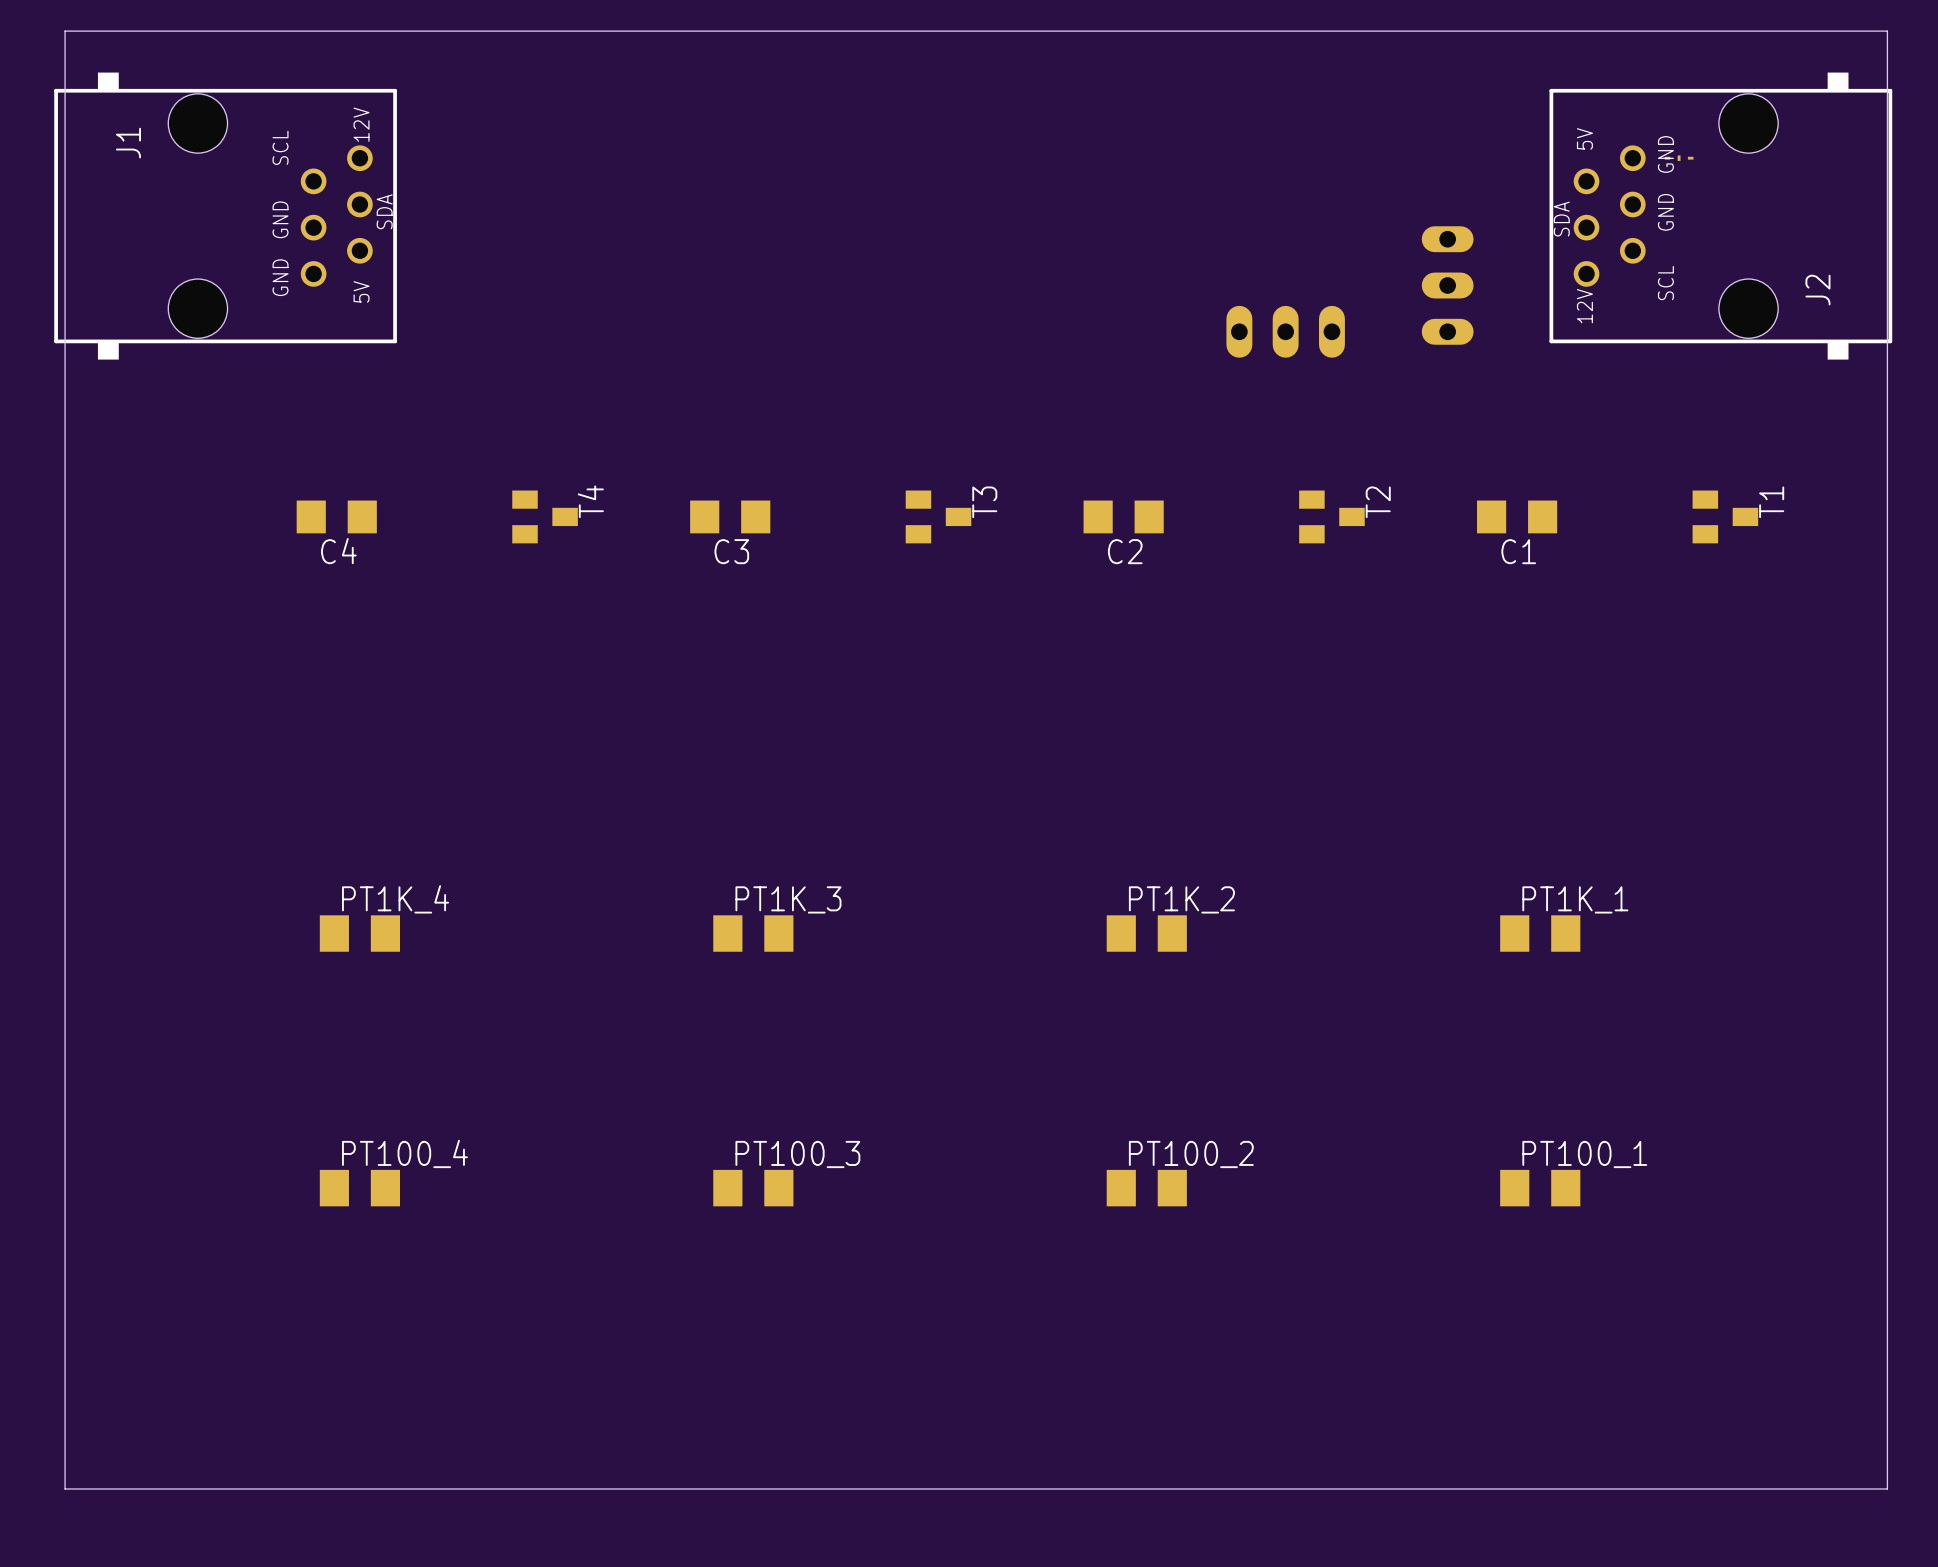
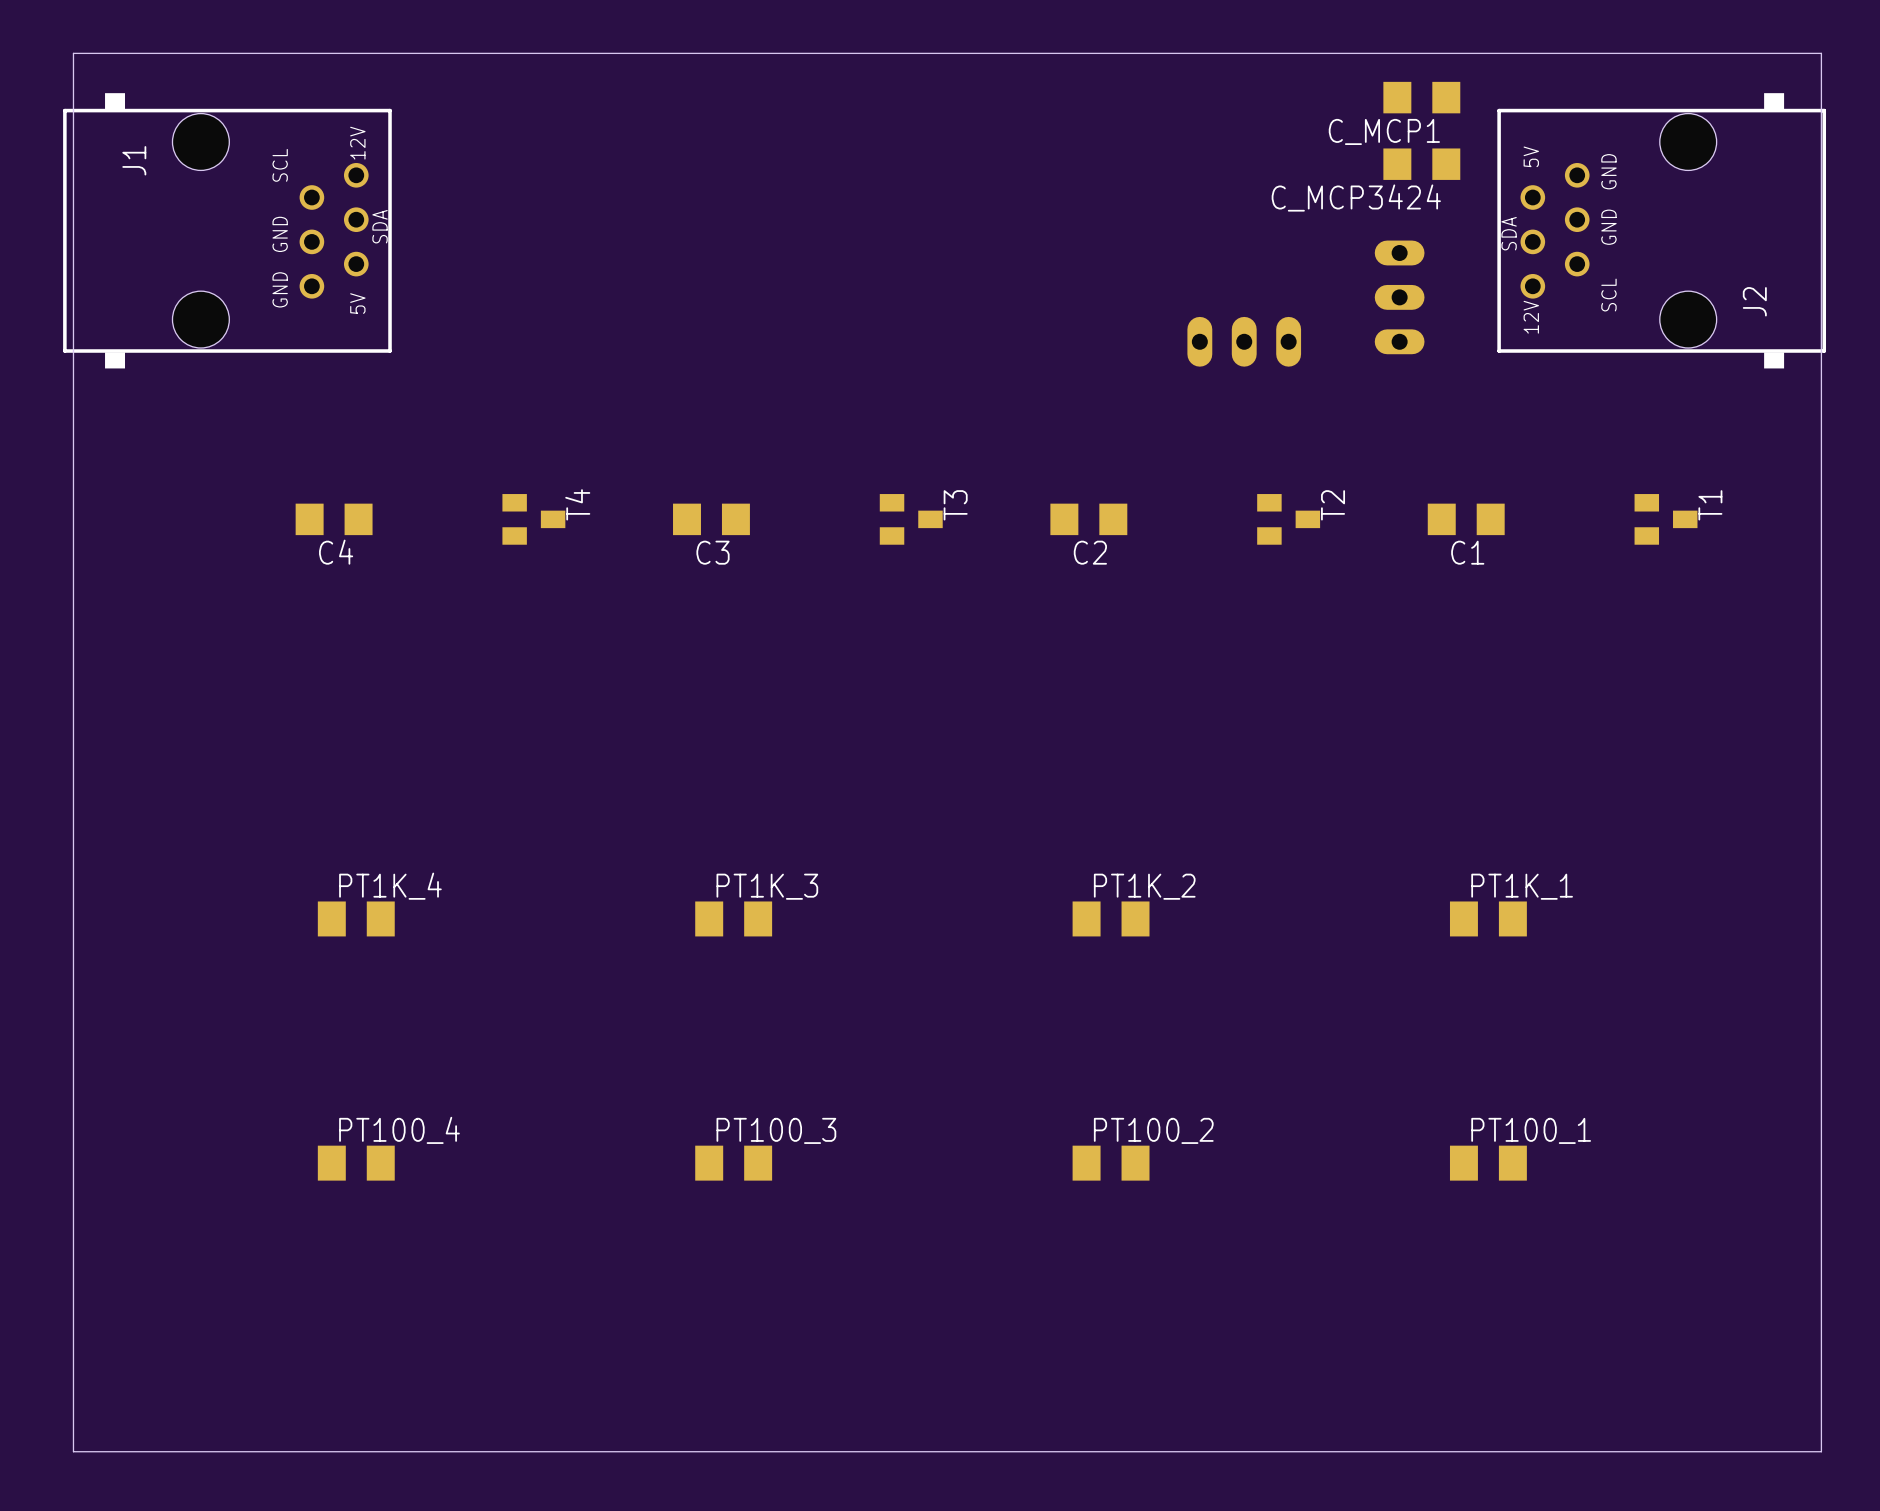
C_MCP1: none -> (1421, 97)
C_MCP3424: none -> (1421, 164)
part: (1679, 158) -> none

